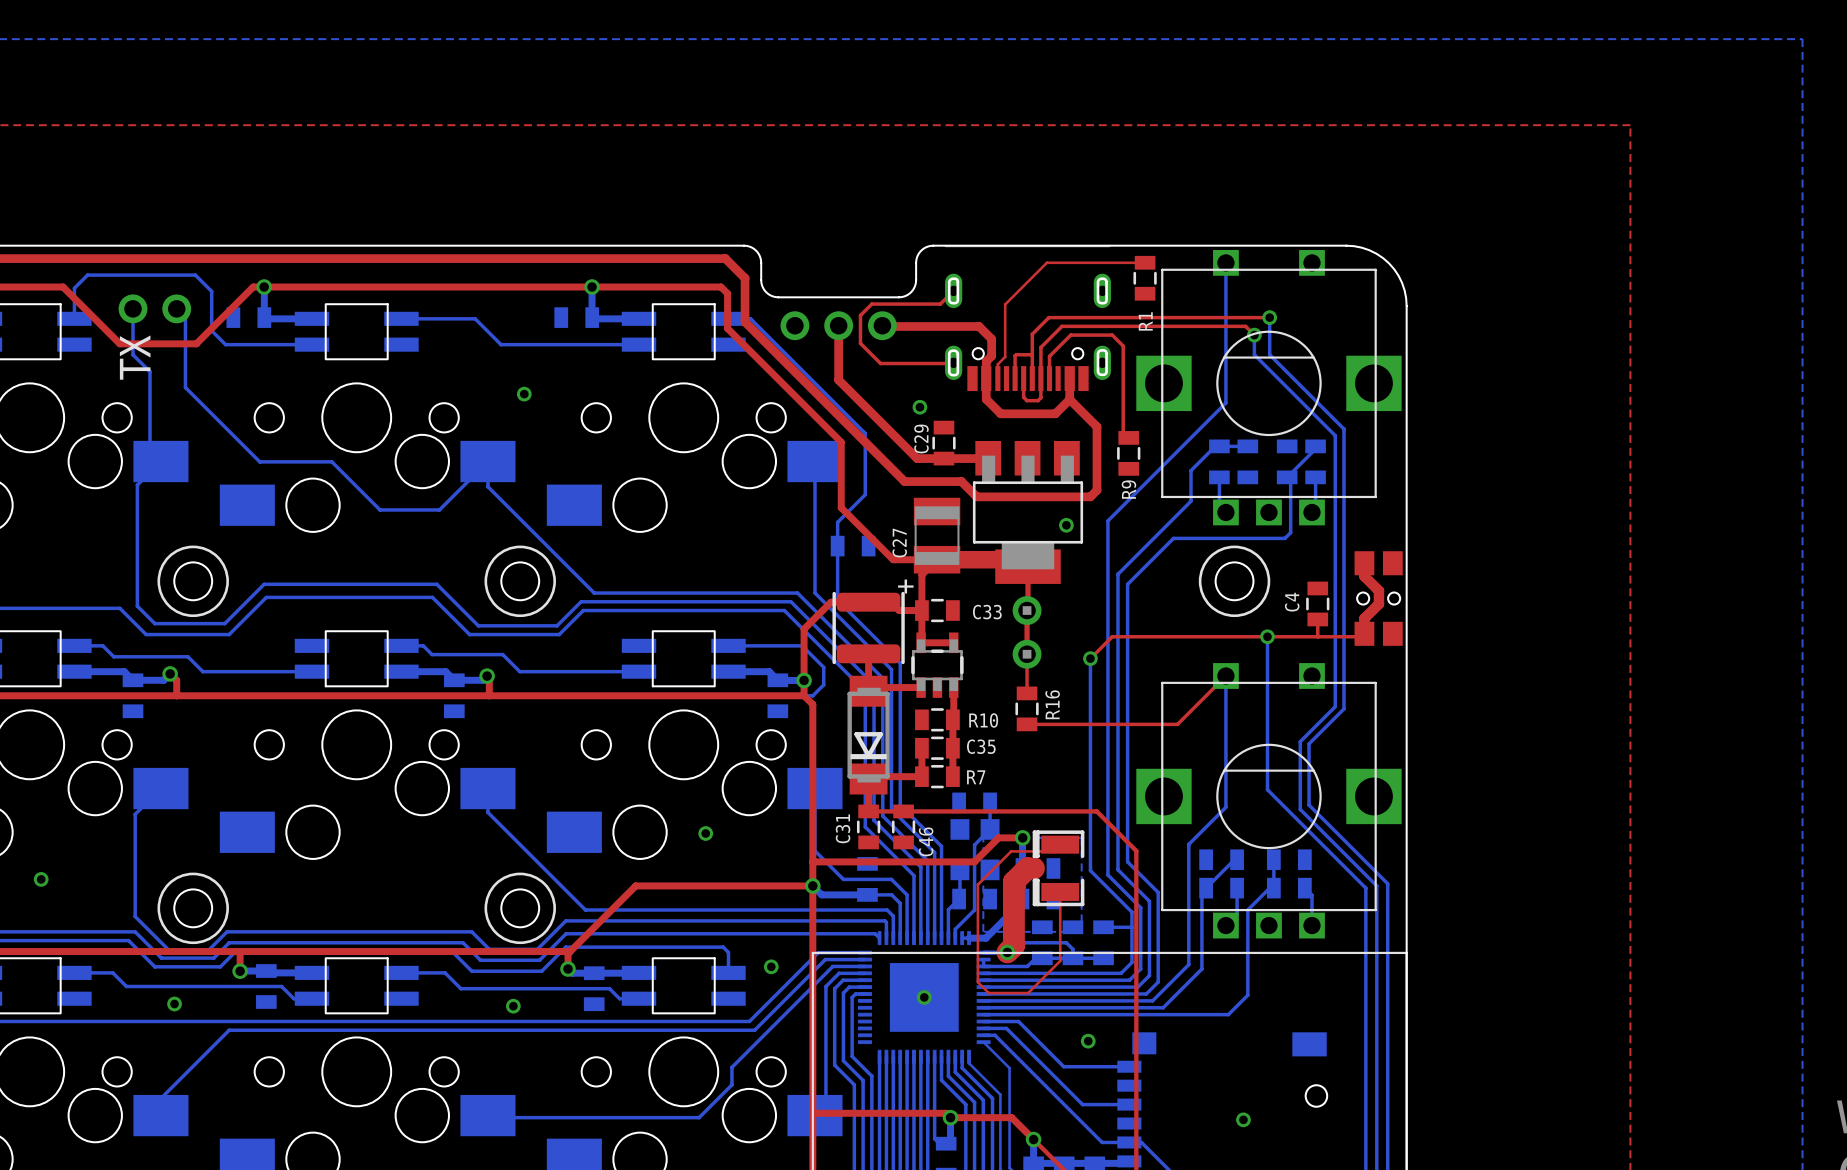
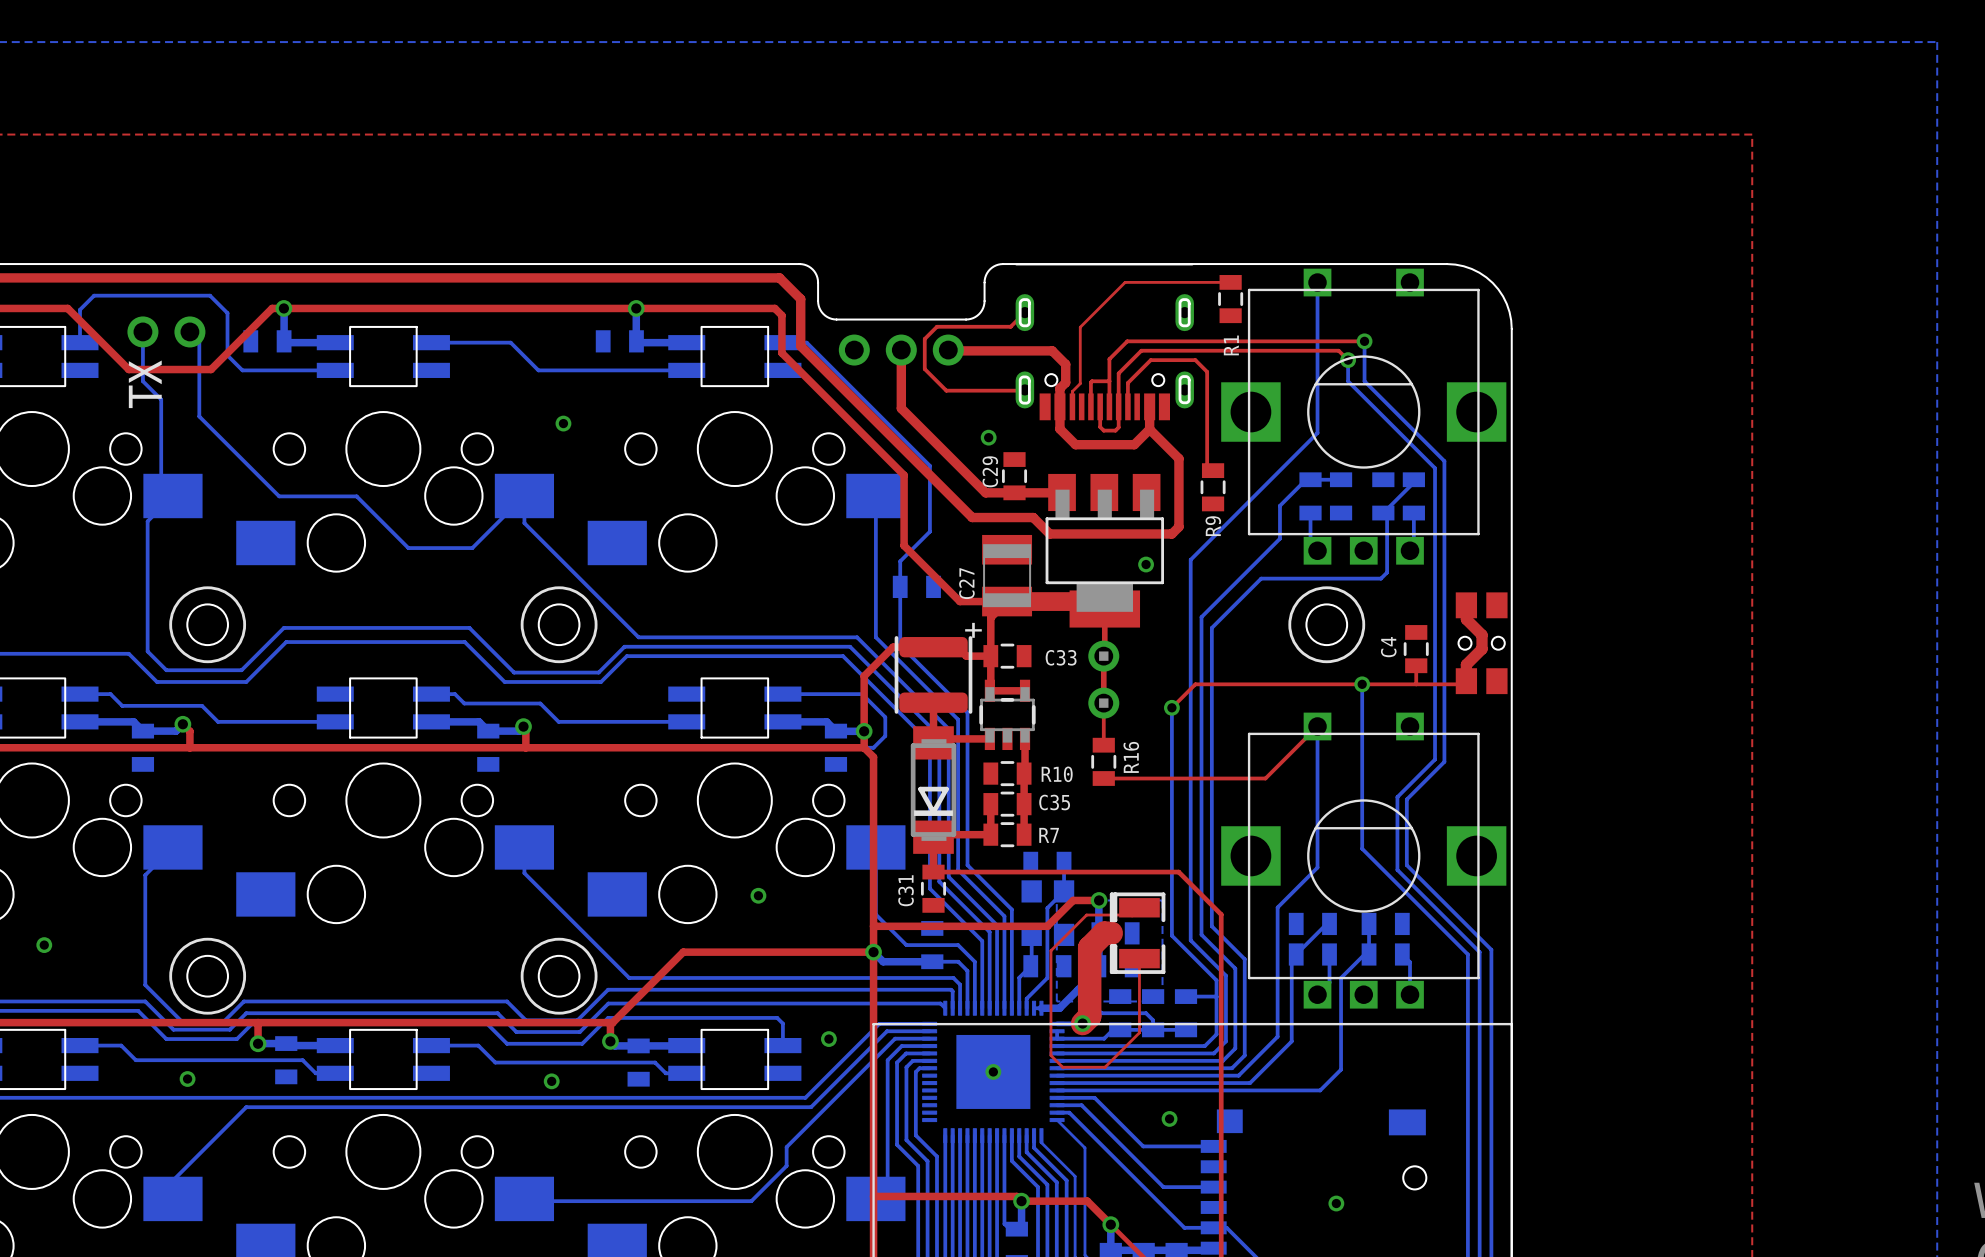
C46: (903, 826) -> none

